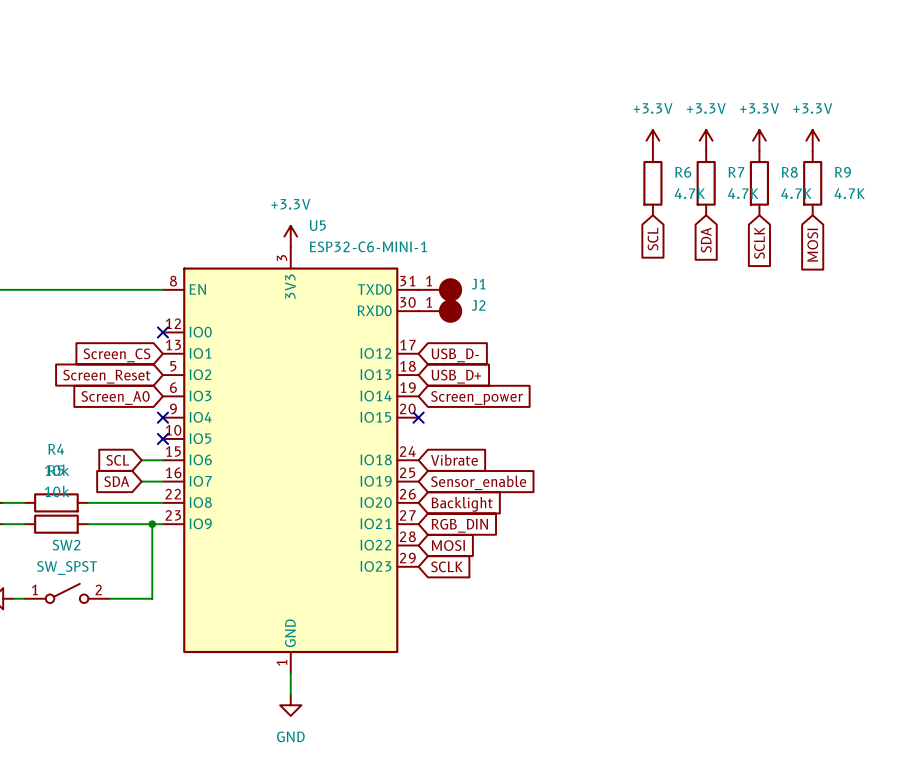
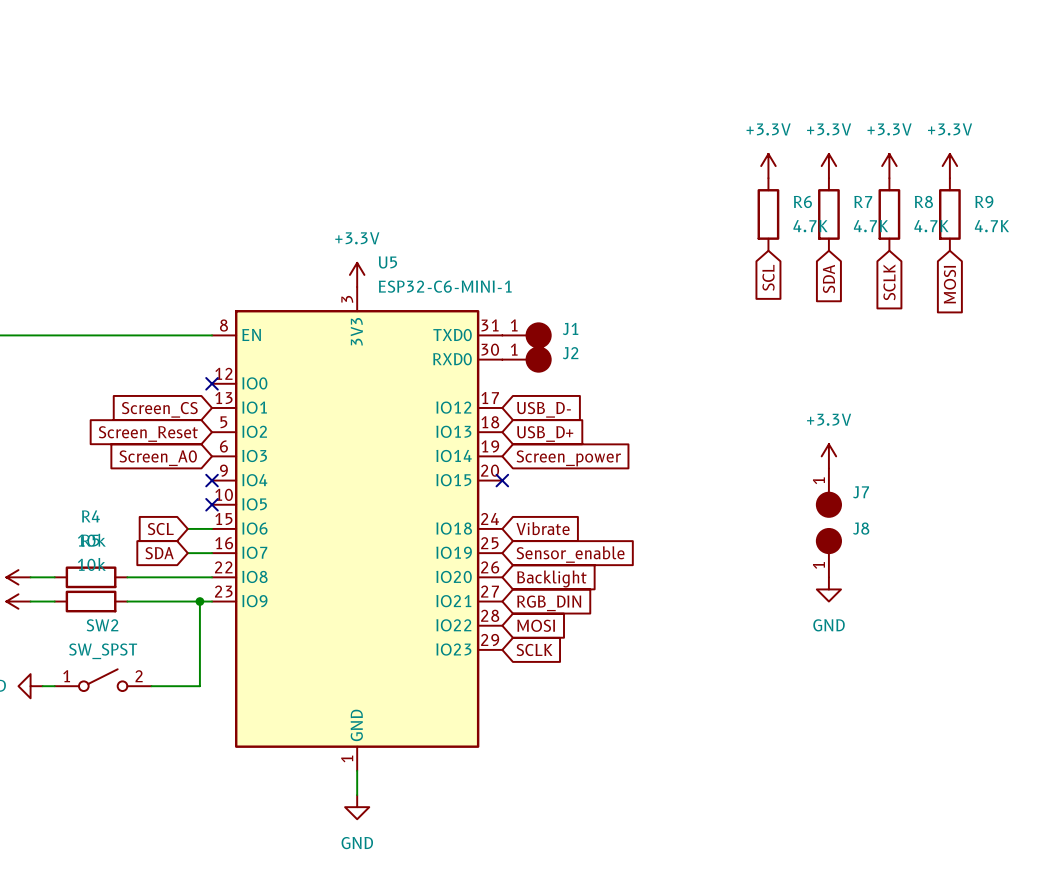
power symbol: none -> +3.3V (828, 456)
J7: none -> (828, 492)
J8: none -> (828, 553)
power symbol: none -> GND (828, 589)

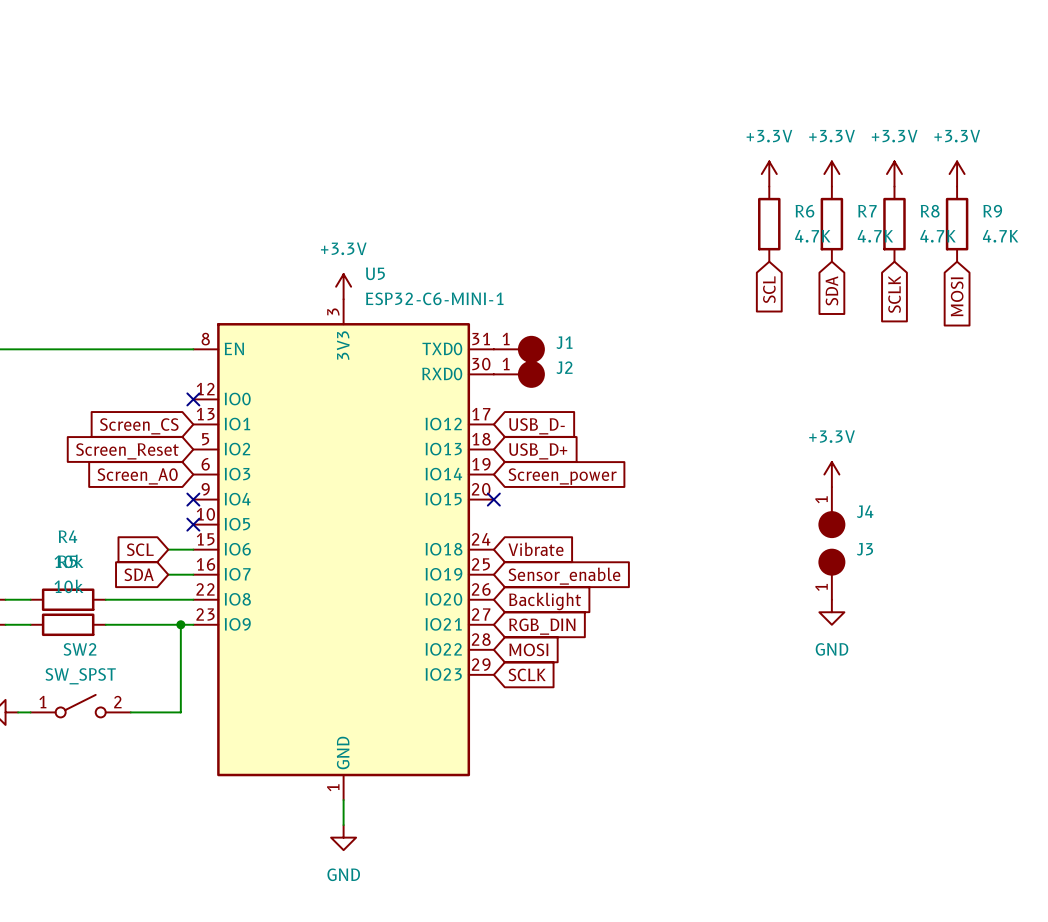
J7 name: J7 (861, 492) -> J4 (865, 511)
J8 name: J8 (861, 528) -> J3 (864, 549)

